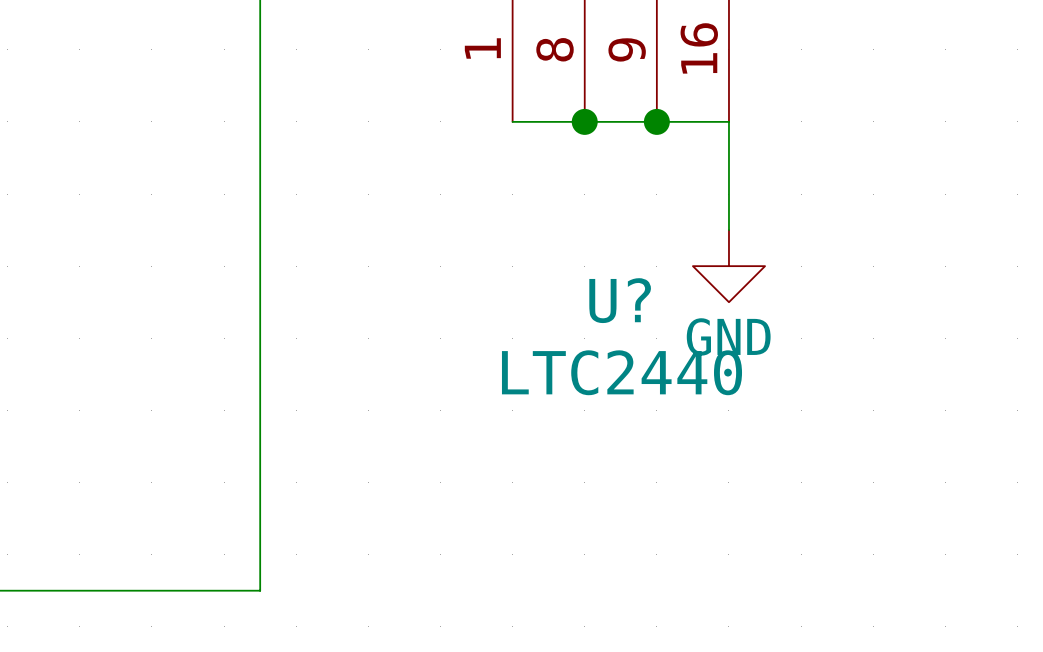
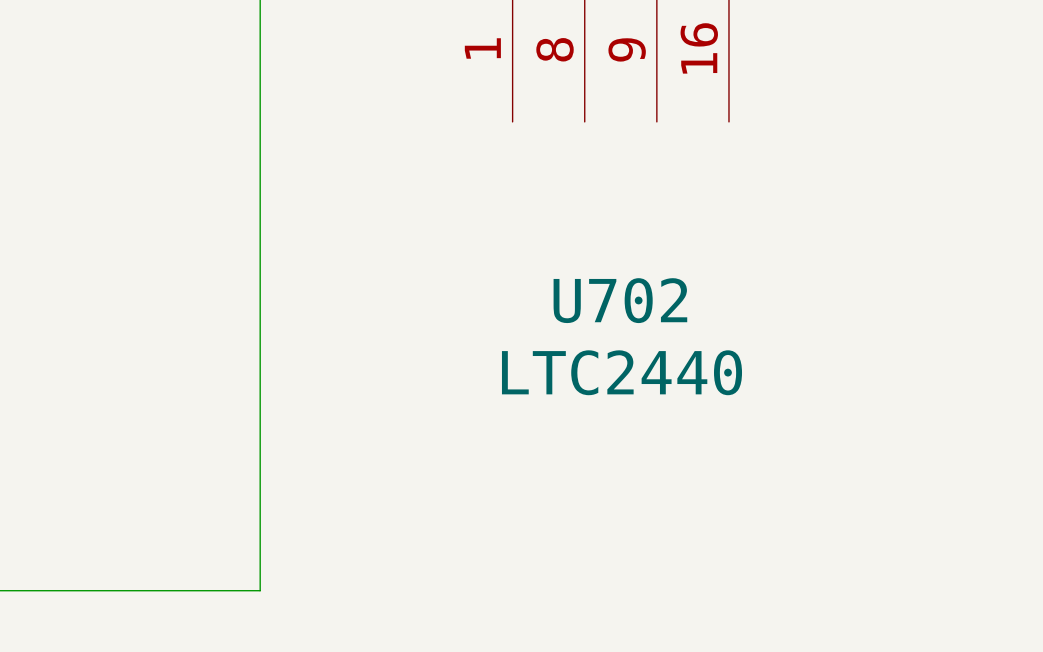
wire: (512, 121) (728, 121) (728, 230) -> none
junction: (584, 121) -> none
junction: (656, 121) -> none
power symbol: GND (728, 266) -> none
U? name: U? (620, 300) -> U702 (620, 300)

